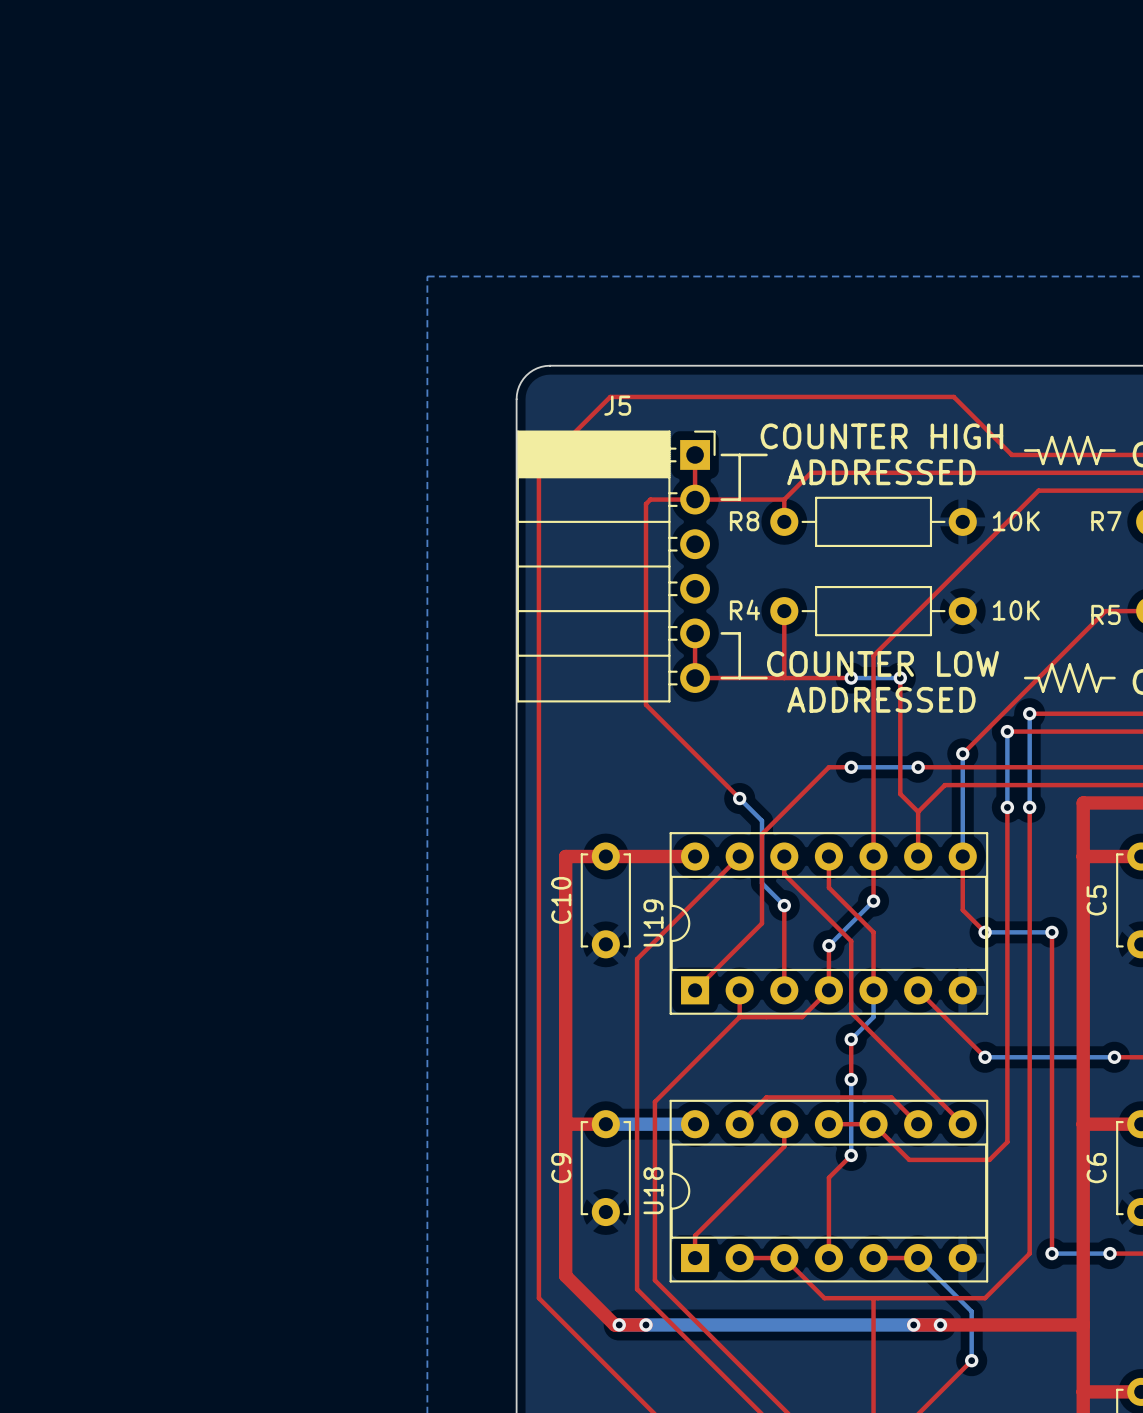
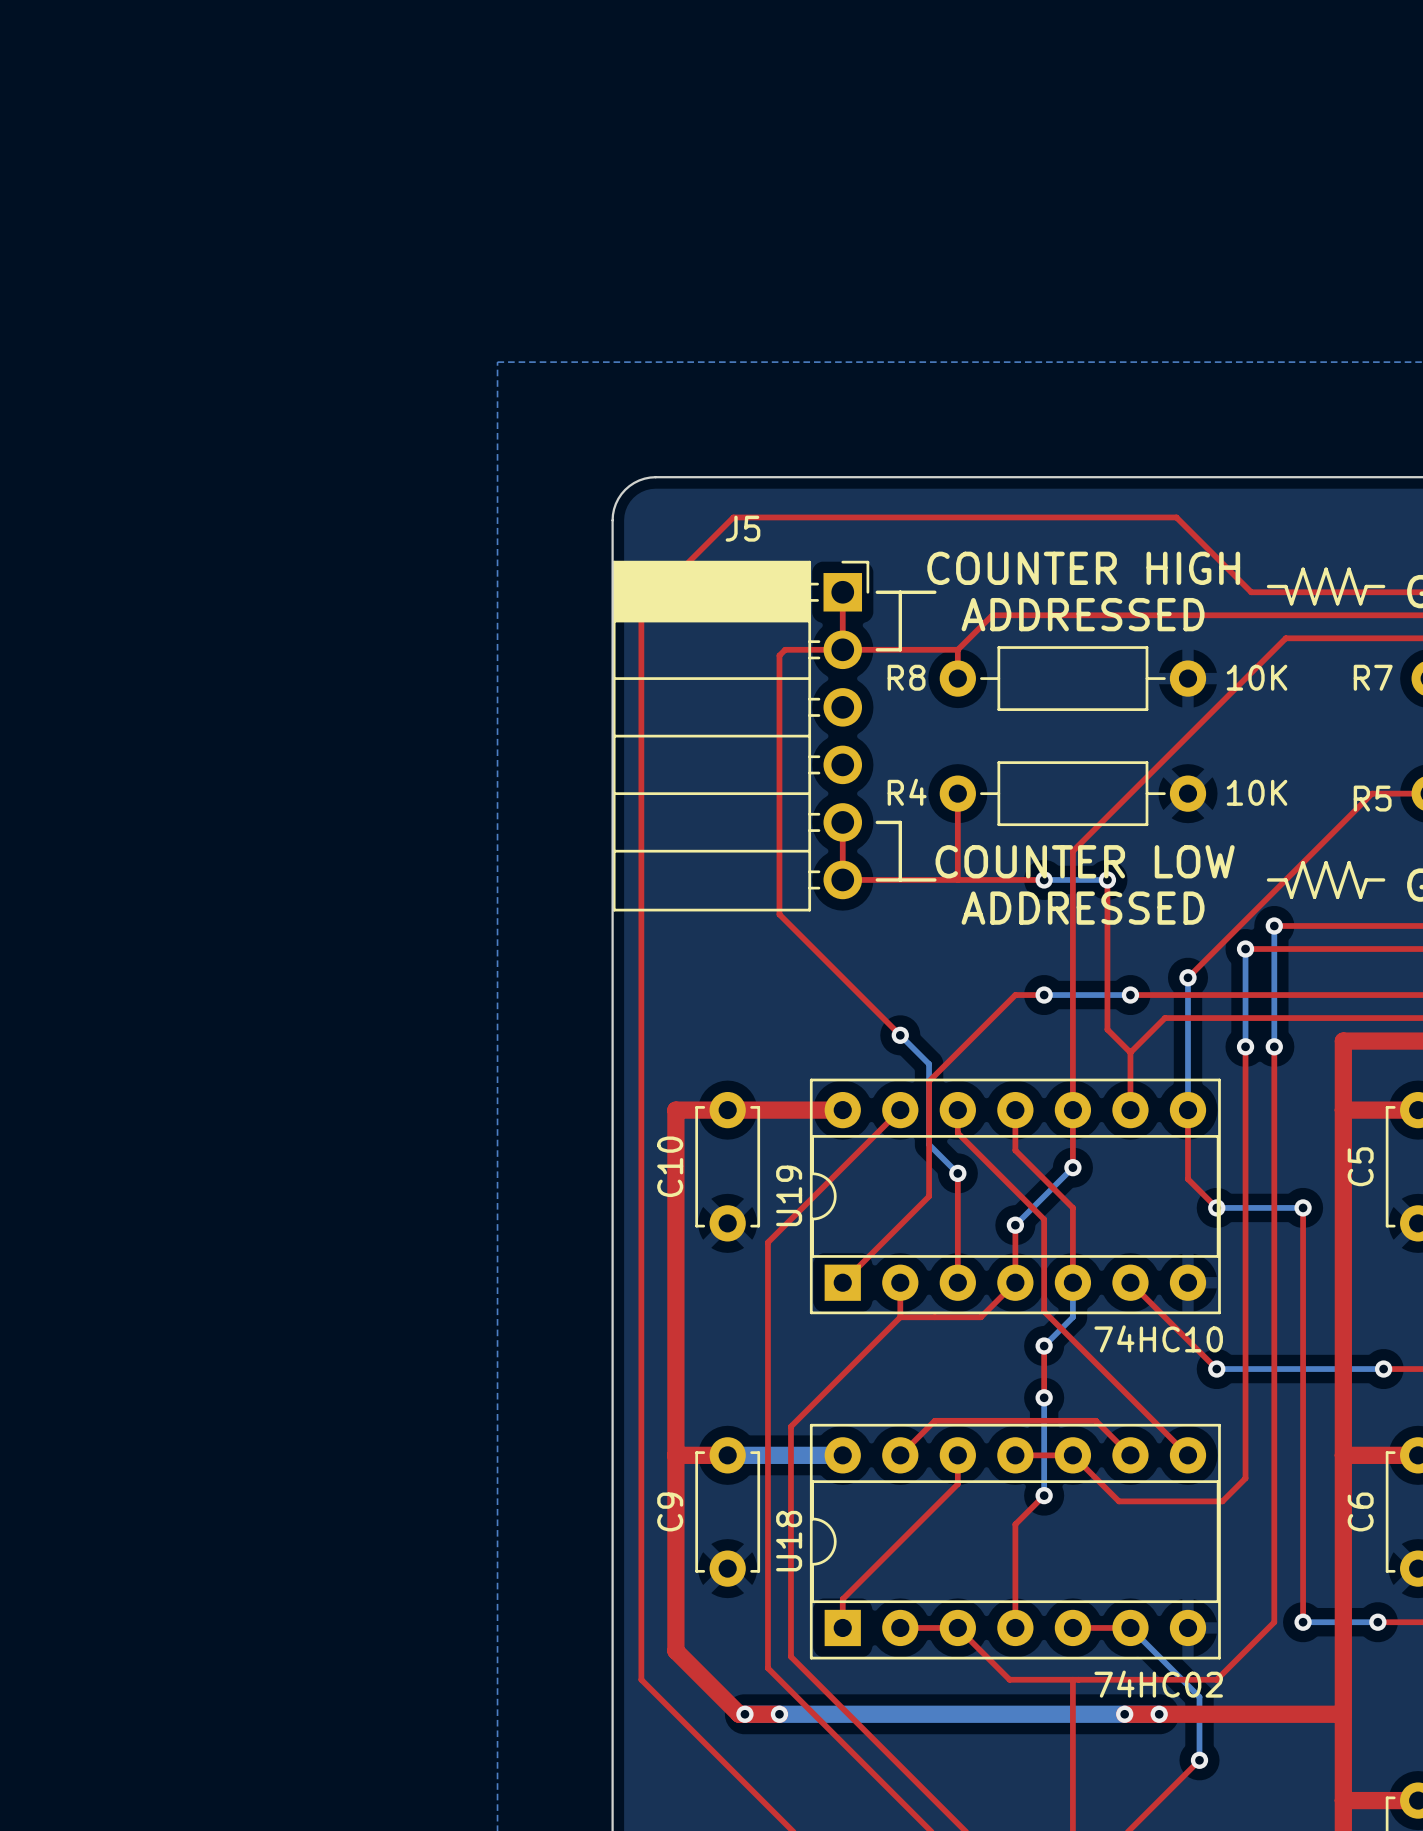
U19 value: none -> 74HC10 (1158, 1338)
U18 value: none -> 74HC02 (1158, 1684)

